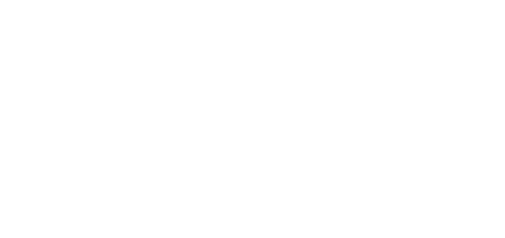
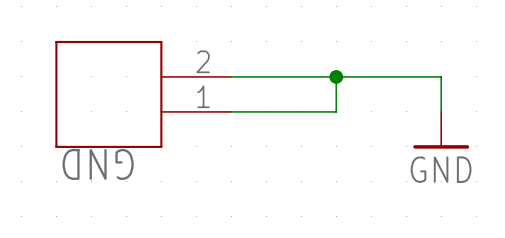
wire: none -> (231, 76) (441, 76) (441, 111)
wire: none -> (336, 76) (336, 111) (231, 111)
junction: none -> (336, 76)
GND: none -> (143, 94)
power symbol: none -> GND (441, 130)

